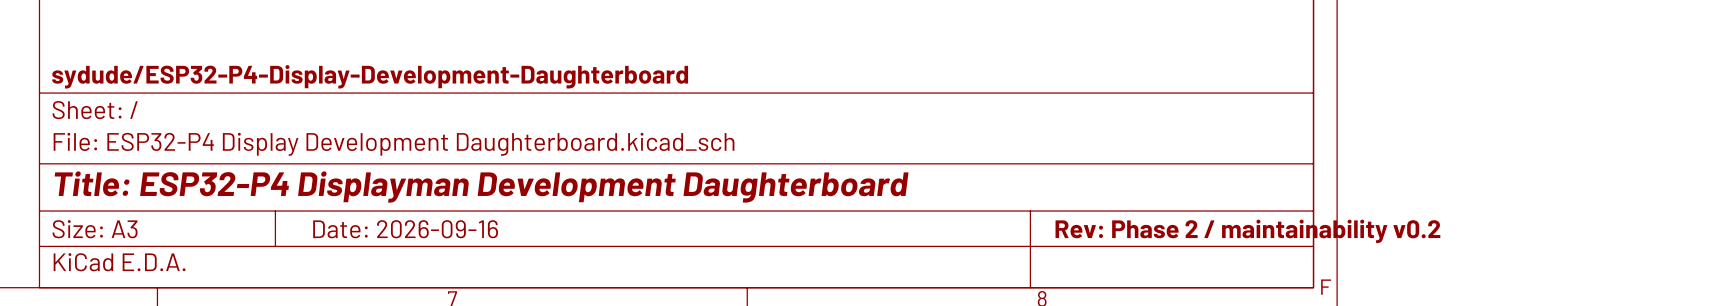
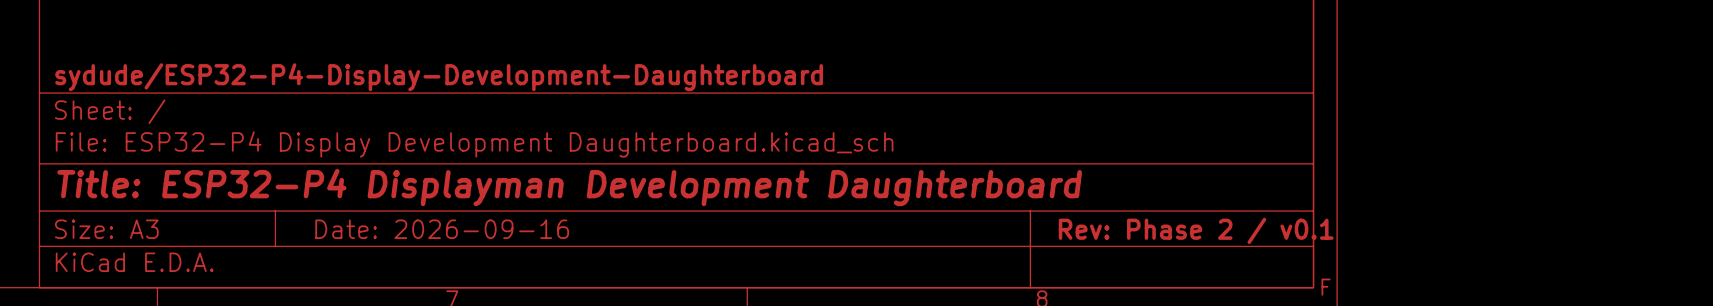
title block: Rev: Phase 2 / maintainability v0.2 (1247, 231) -> Rev: Phase 2 / v0.1 (1196, 230)

